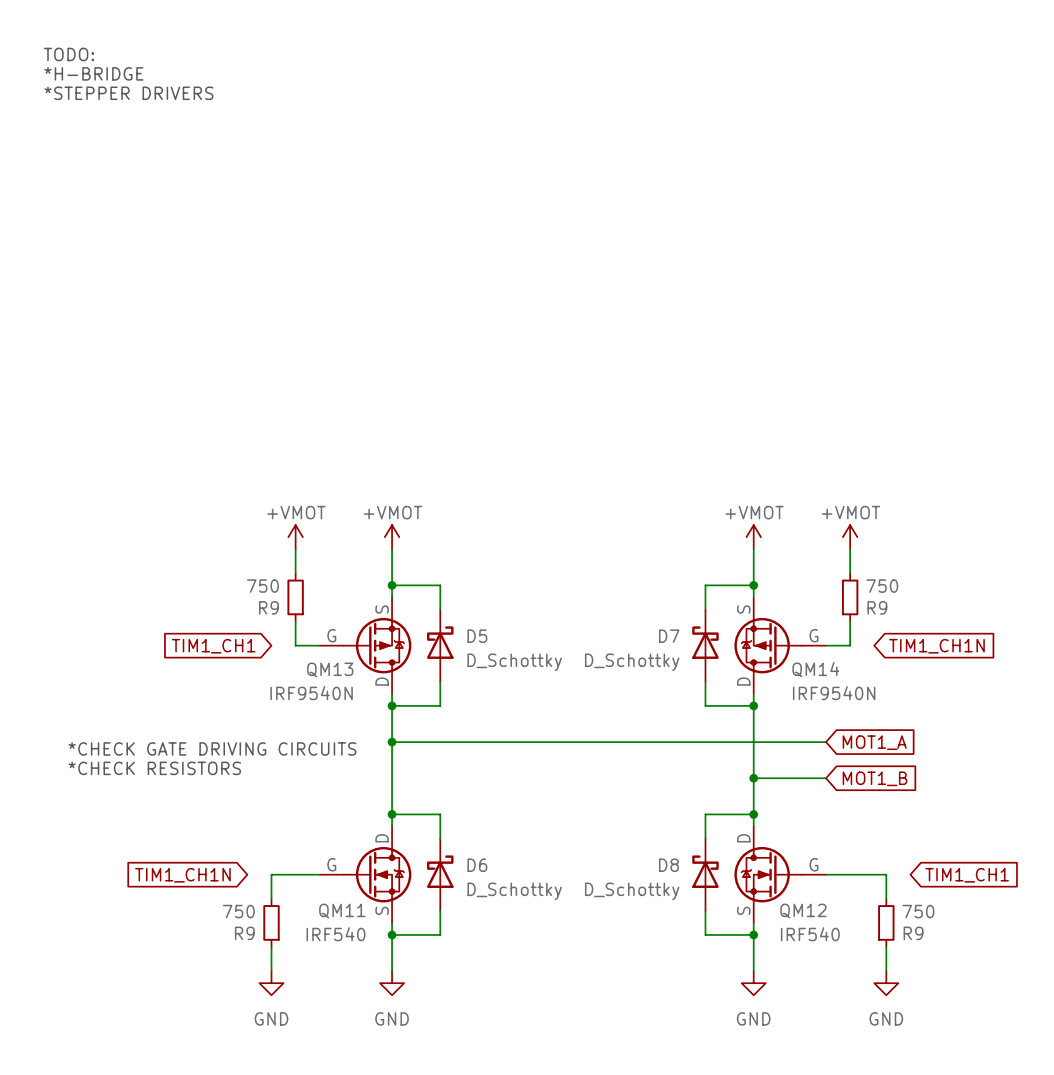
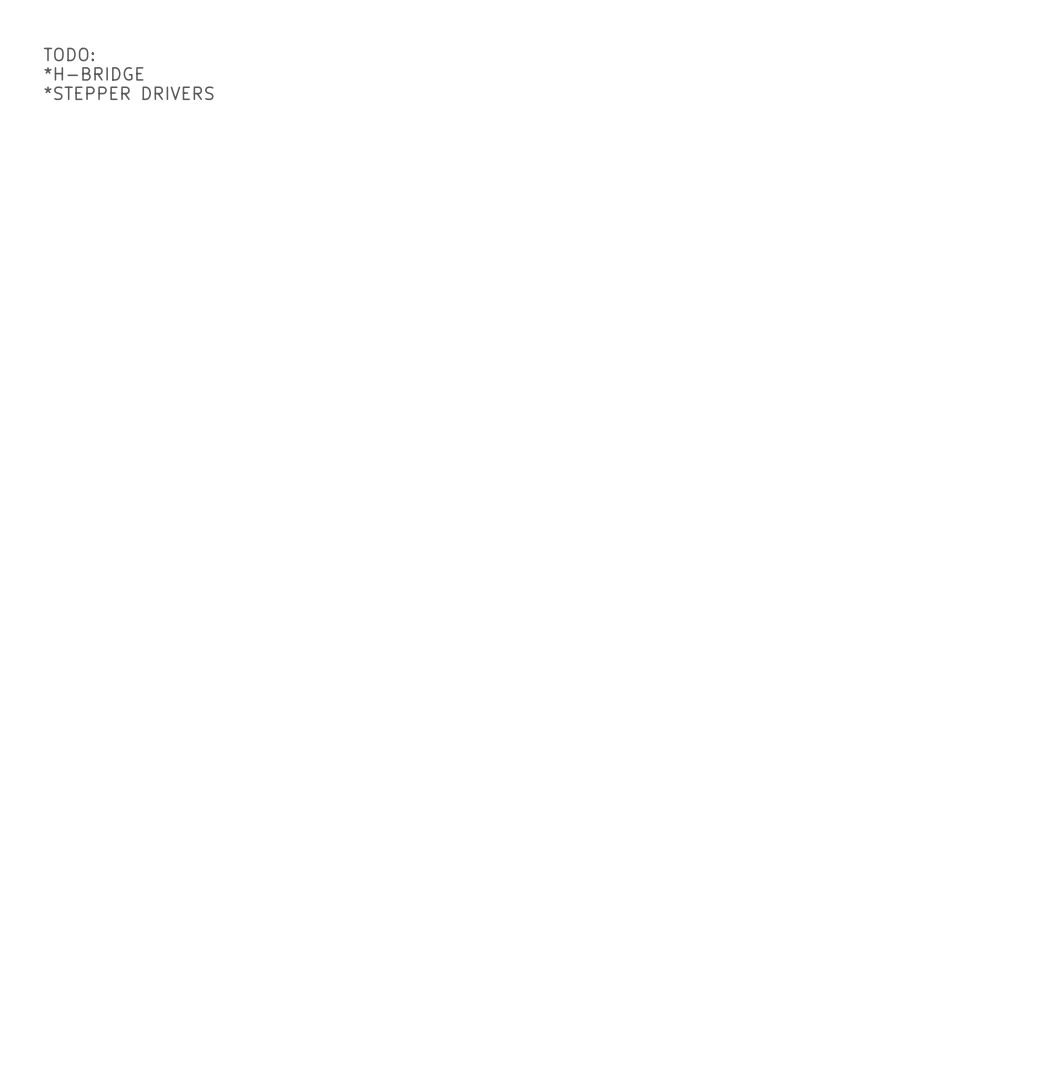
power symbol: +VMOT (295, 537) -> none
power symbol: +VMOT (392, 537) -> none
power symbol: +VMOT (753, 537) -> none
power symbol: +VMOT (850, 537) -> none
wire: (295, 549) (295, 573) -> none
wire: (392, 549) (392, 597) -> none
wire: (753, 549) (753, 597) -> none
wire: (850, 549) (850, 573) -> none
wire: (392, 585) (440, 585) (440, 609) -> none
junction: (392, 585) -> none
wire: (753, 585) (705, 585) (705, 609) -> none
junction: (753, 585) -> none
R9: 750 (295, 597) -> none
R9: 750 (850, 597) -> none
wire: (295, 621) (295, 645) (319, 645) -> none
wire: (850, 621) (850, 645) (826, 645) -> none
QM13: IRF9540N (365, 645) -> none
D5: D_Schottky (440, 645) -> none
D7: D_Schottky (705, 645) -> none
QM14: IRF9540N (780, 645) -> none
global label: TIM1_CH1 (213, 646) -> none
global label: TIM1_CH1N (936, 646) -> none
wire: (440, 681) (440, 705) (392, 705) -> none
wire: (705, 681) (705, 705) (753, 705) -> none
wire: (392, 693) (392, 826) -> none
wire: (753, 693) (753, 826) -> none
junction: (392, 705) -> none
junction: (753, 705) -> none
wire: (392, 742) (826, 742) -> none
junction: (392, 742) -> none
global label: MOT1_A (874, 742) -> none
text: *CHECK GATE DRIVING CIRCUITS (212, 748) -> none
text: *CHECK RESISTORS (154, 768) -> none
wire: (753, 778) (826, 778) -> none
junction: (753, 778) -> none
global label: MOT1_B (874, 778) -> none
wire: (392, 814) (440, 814) (440, 838) -> none
junction: (392, 814) -> none
wire: (753, 814) (705, 814) (705, 838) -> none
junction: (753, 814) -> none
wire: (319, 874) (271, 874) (271, 898) -> none
QM11: IRF540 (365, 874) -> none
D6: D_Schottky (440, 874) -> none
D8: D_Schottky (705, 874) -> none
QM12: IRF540 (780, 874) -> none
wire: (826, 874) (886, 874) (886, 898) -> none
global label: TIM1_CH1N (182, 875) -> none
global label: TIM1_CH1 (967, 875) -> none
wire: (440, 910) (440, 934) (392, 934) -> none
wire: (705, 910) (705, 934) (753, 934) -> none
R9: 750 (271, 922) -> none
wire: (392, 922) (392, 971) -> none
wire: (753, 922) (753, 971) -> none
R9: 750 (886, 922) -> none
junction: (392, 934) -> none
junction: (753, 934) -> none
wire: (271, 947) (271, 971) -> none
wire: (886, 947) (886, 971) -> none
power symbol: GND (271, 983) -> none
power symbol: GND (392, 983) -> none
power symbol: GND (753, 983) -> none
power symbol: GND (886, 983) -> none

